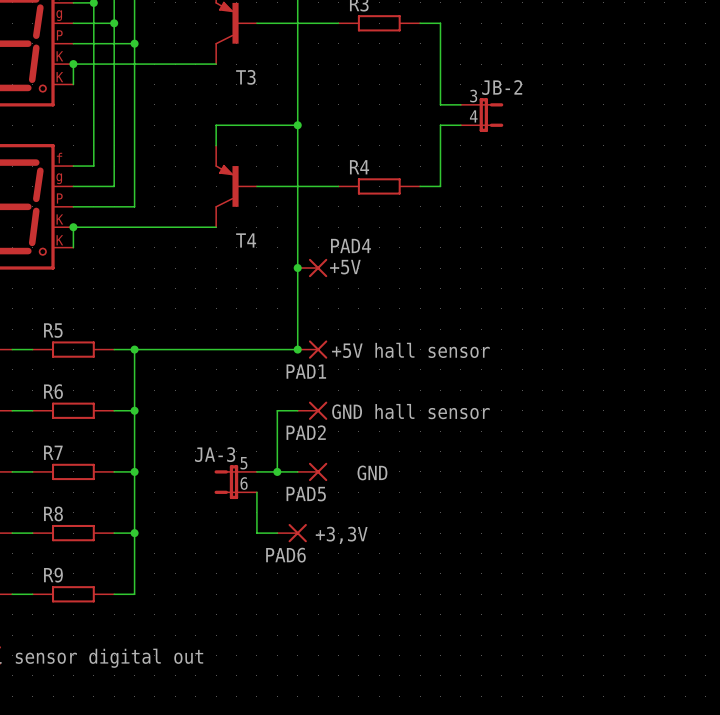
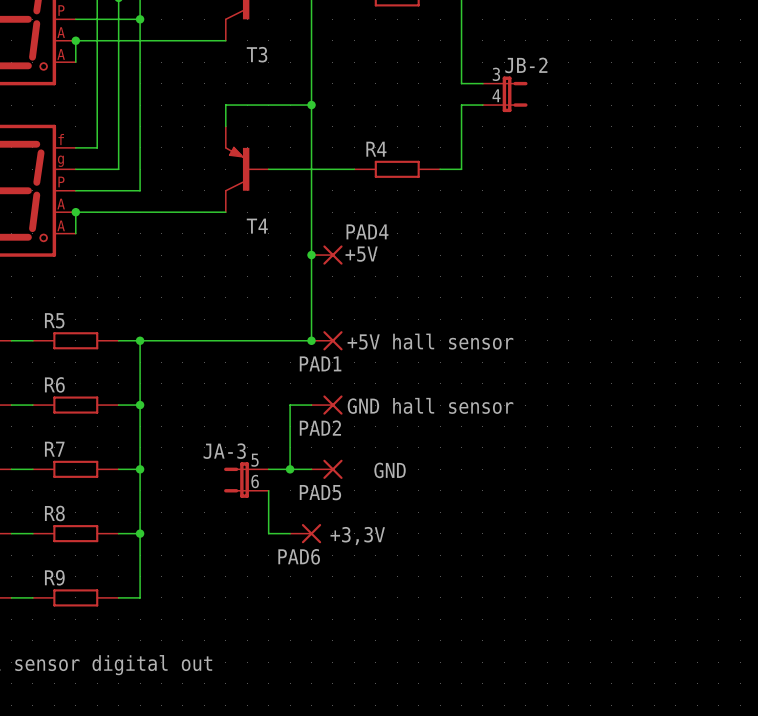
part text: K (59, 56) -> A (61, 32)
part text: K (59, 77) -> A (61, 54)
part text: K (59, 219) -> A (61, 204)
part text: K (59, 240) -> A (61, 225)

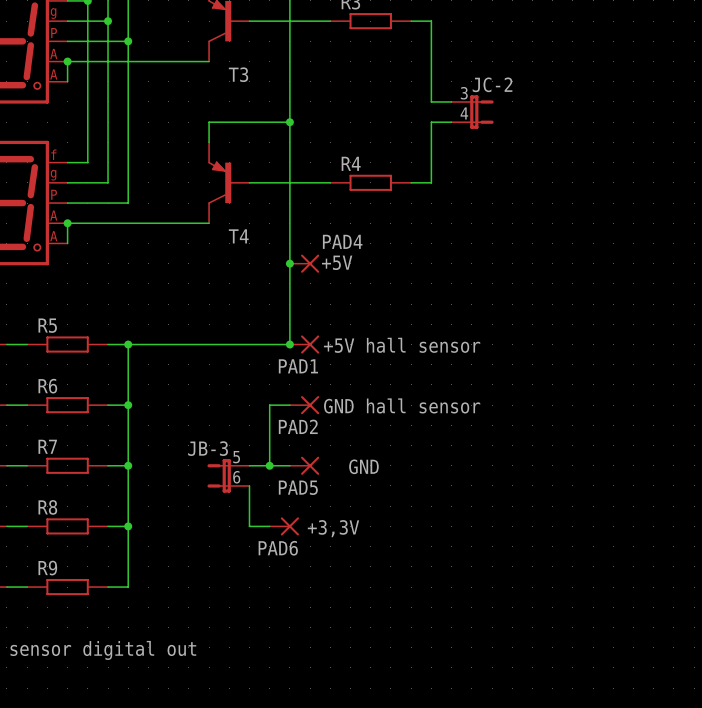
JB-2 name: JB-2 (526, 65) -> JC-2 (492, 84)
JA-3 name: JA-3 (224, 451) -> JB-3 (208, 448)

